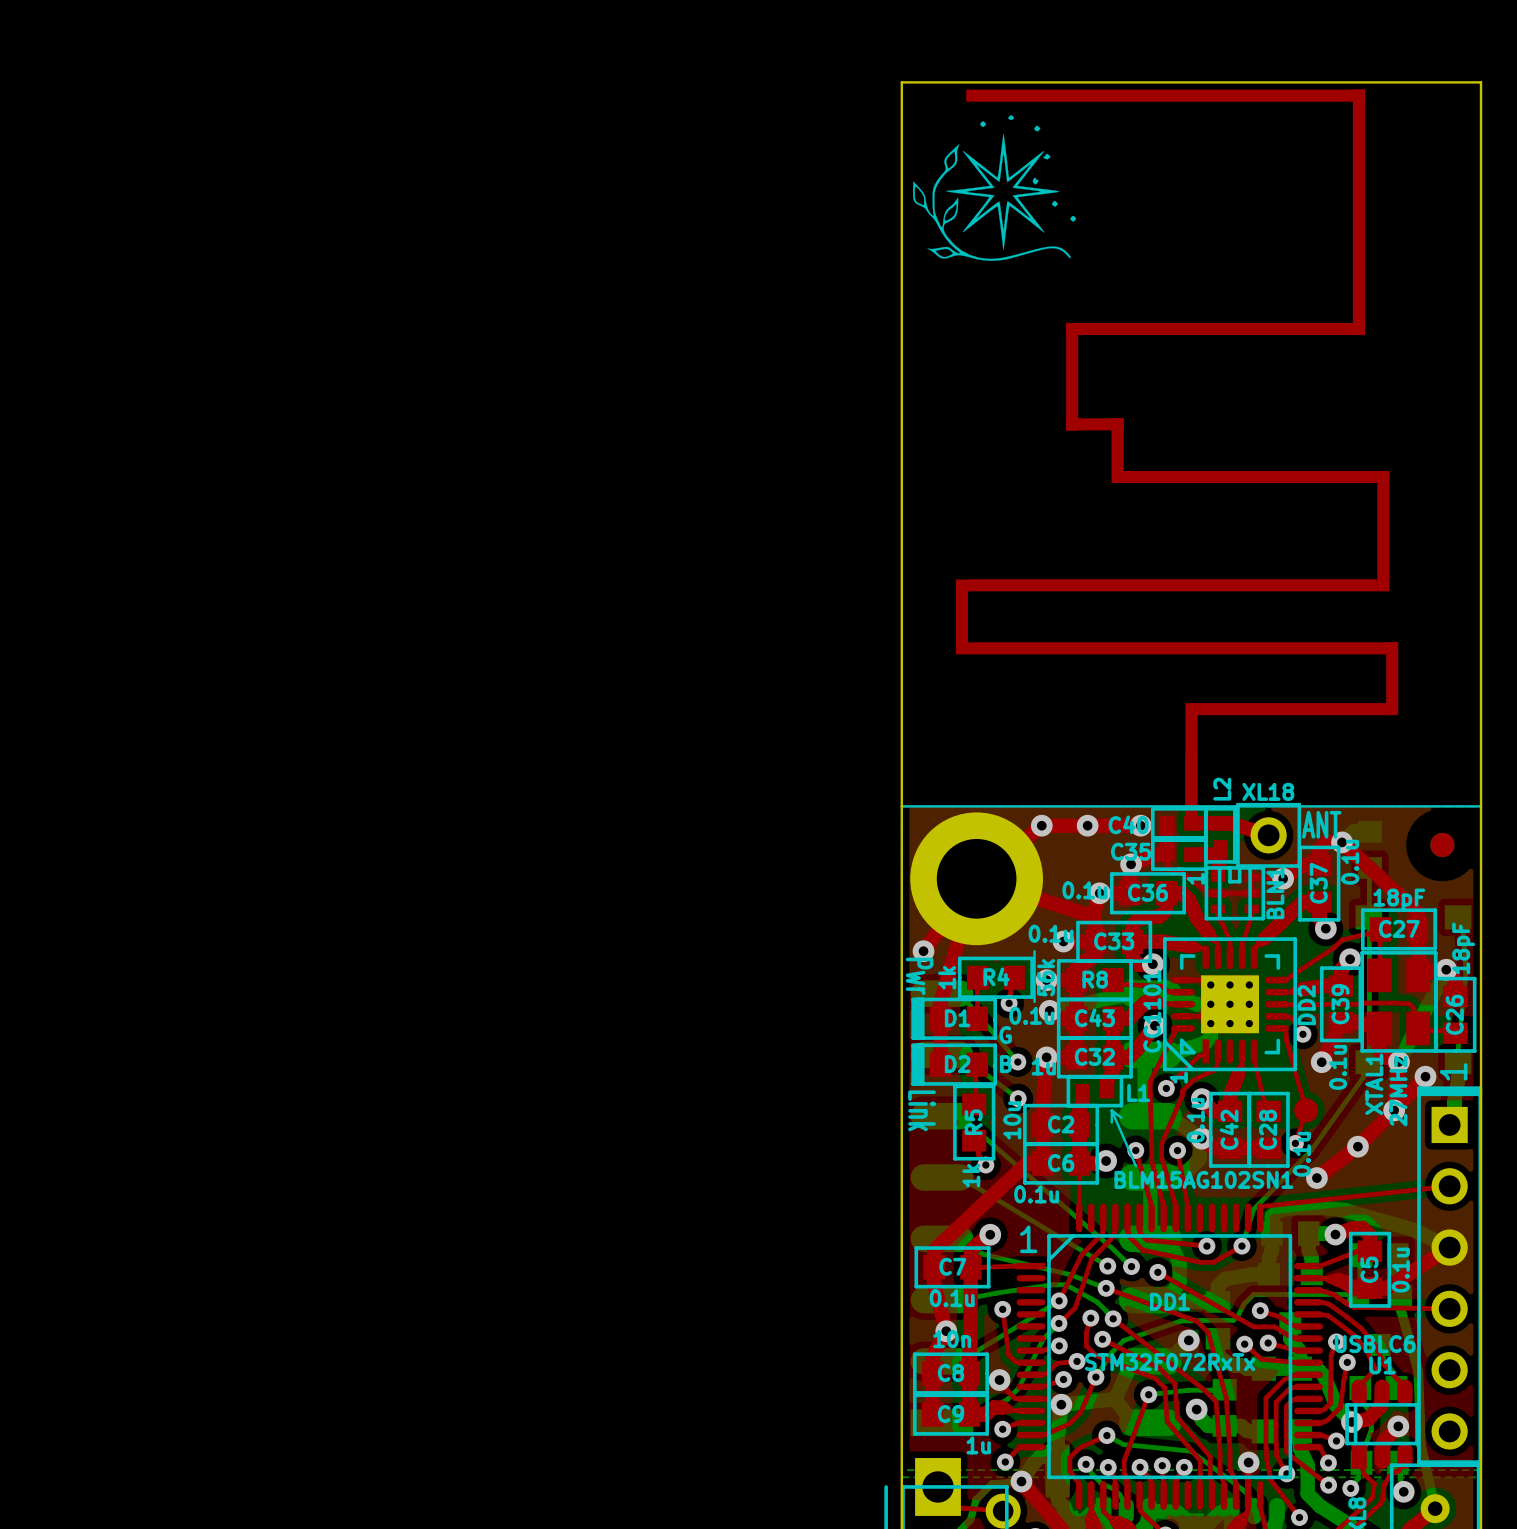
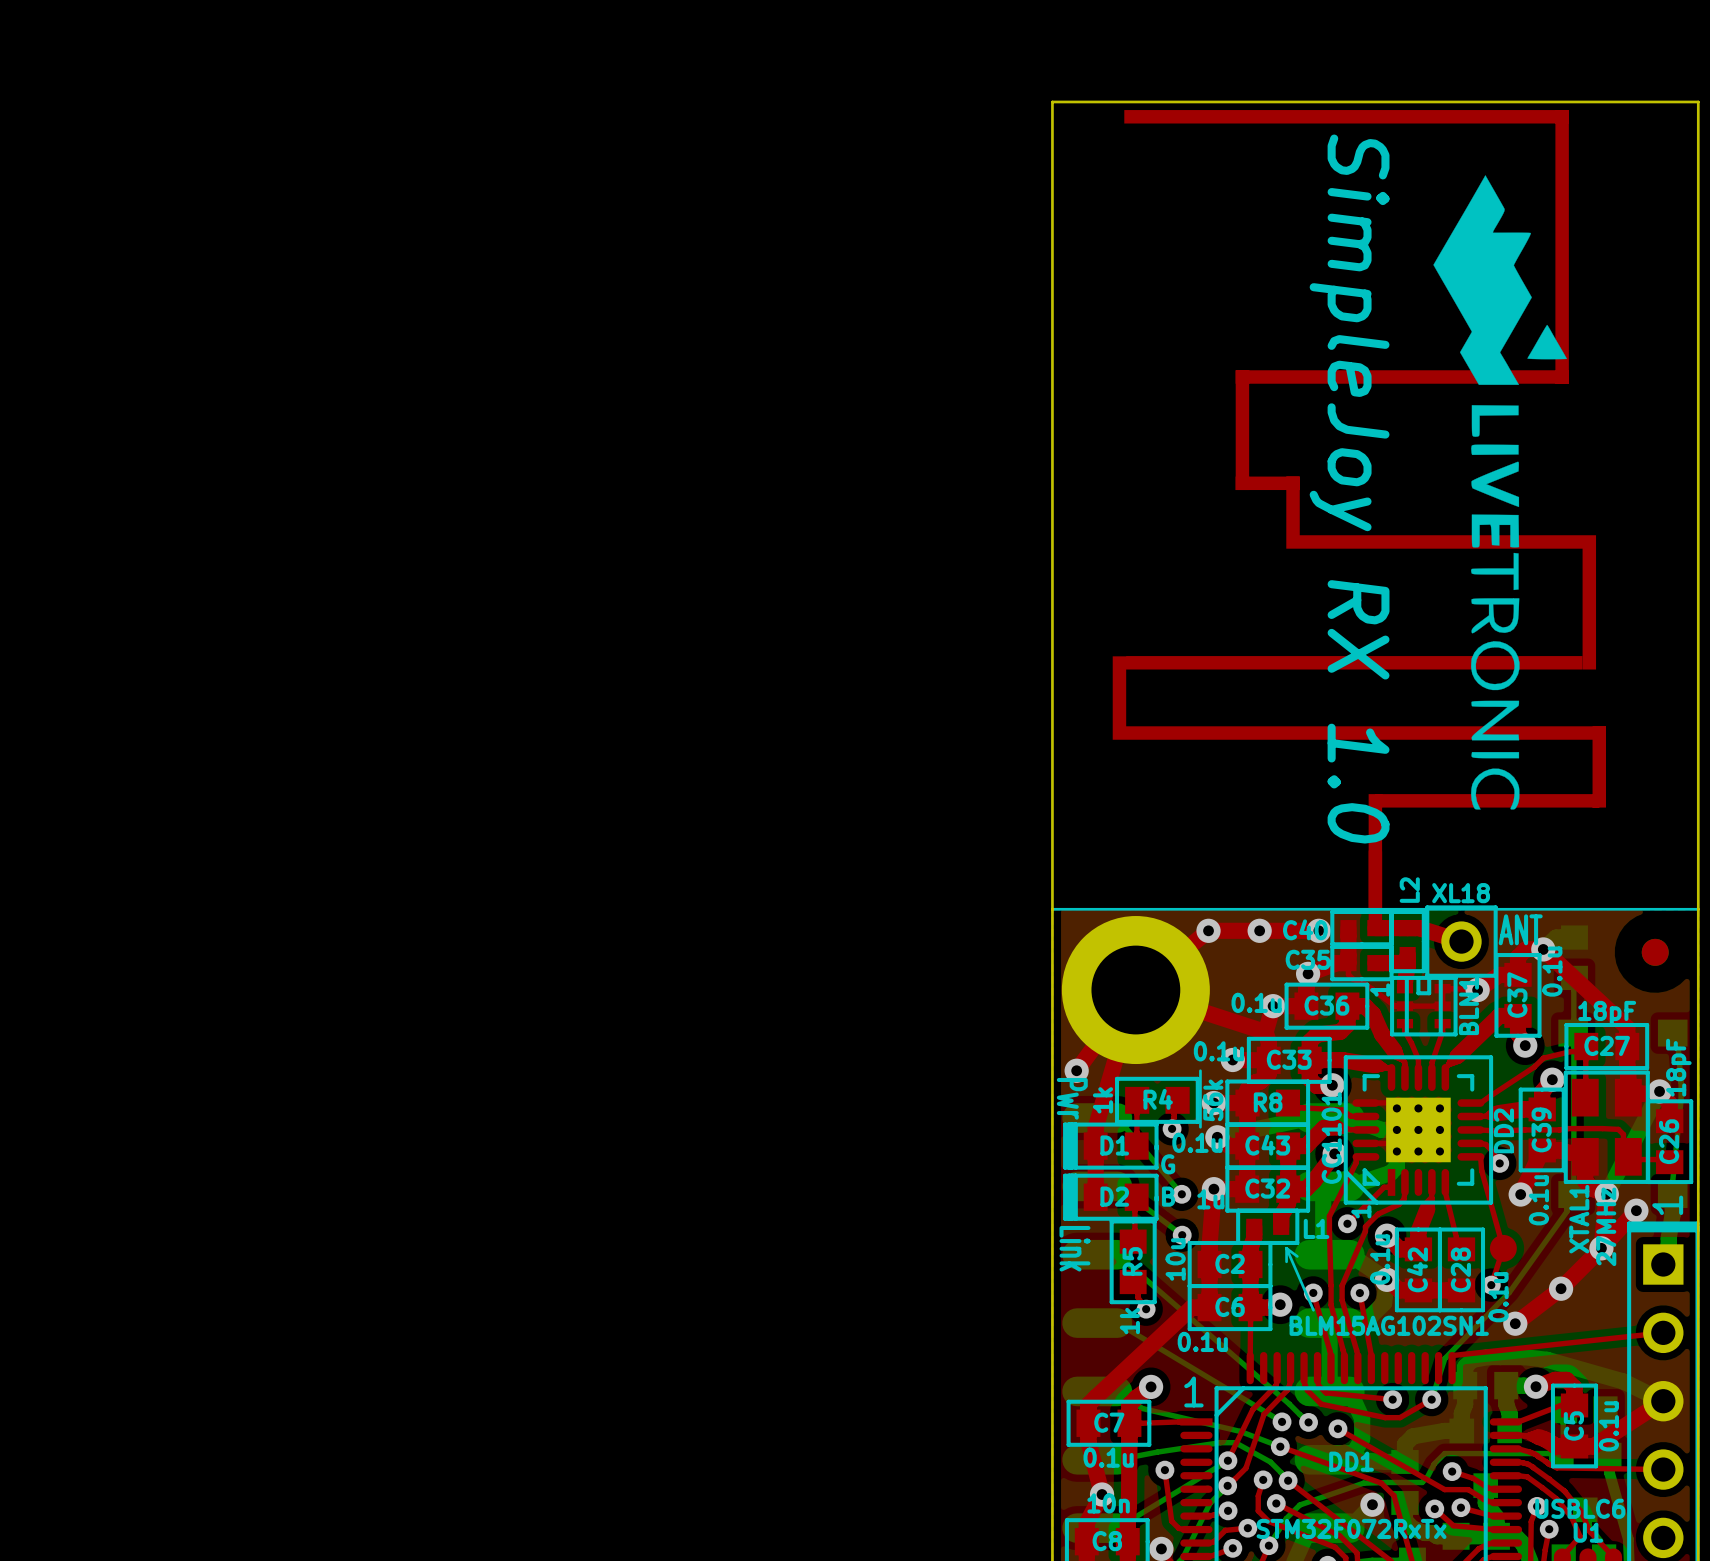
drawing: [912, 115, 1077, 261] -> none
drawing: none -> [1433, 175, 1567, 810]
text: none -> SimpleJoy RX 1.0 (1349, 489)

